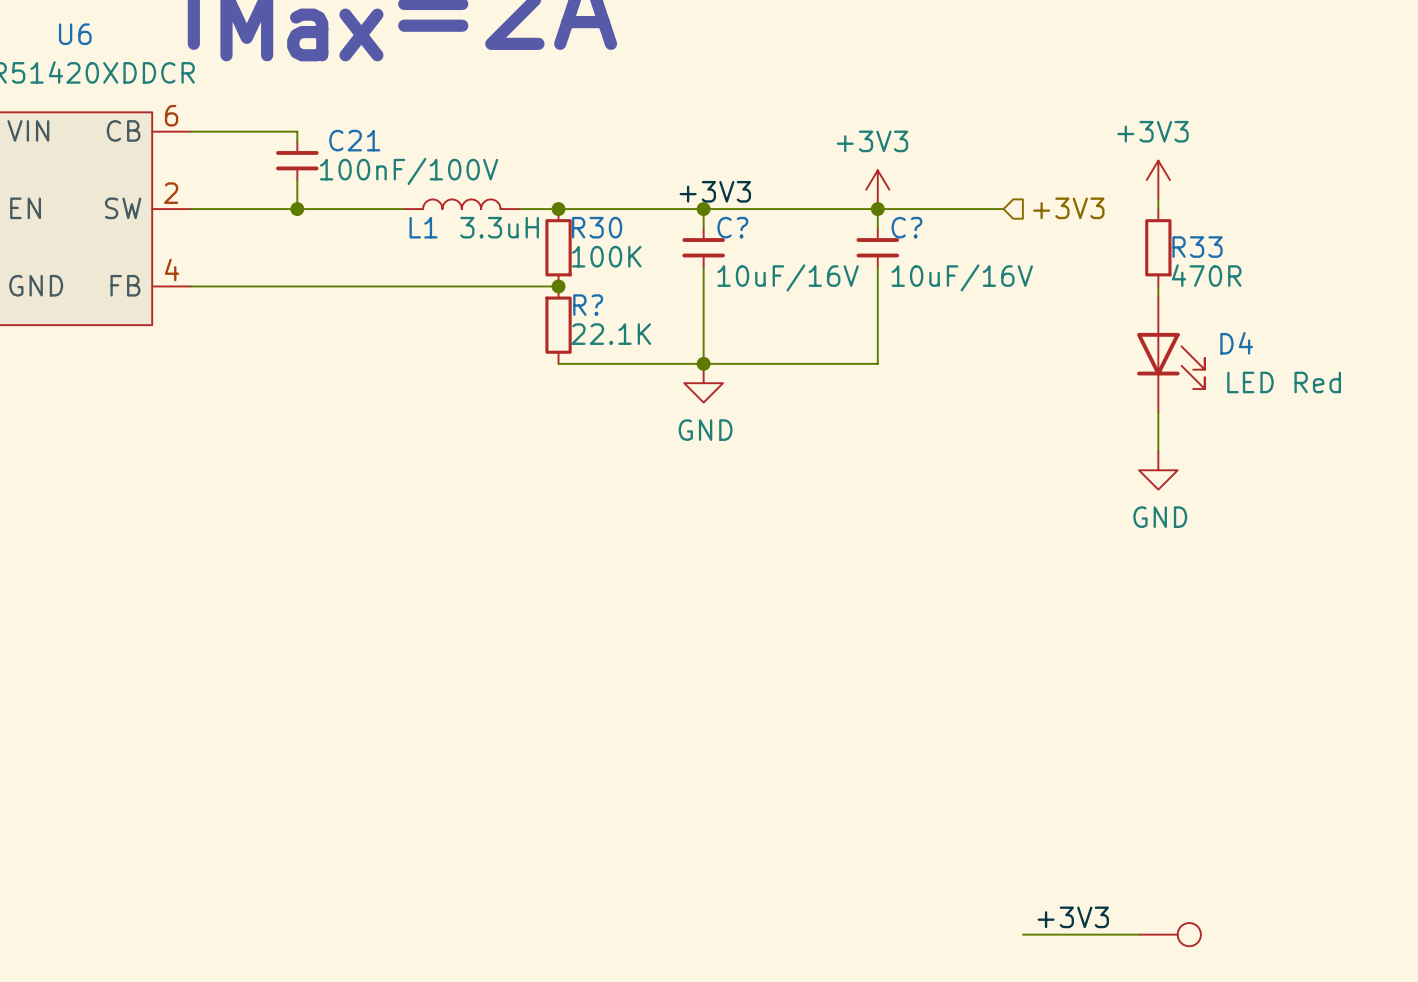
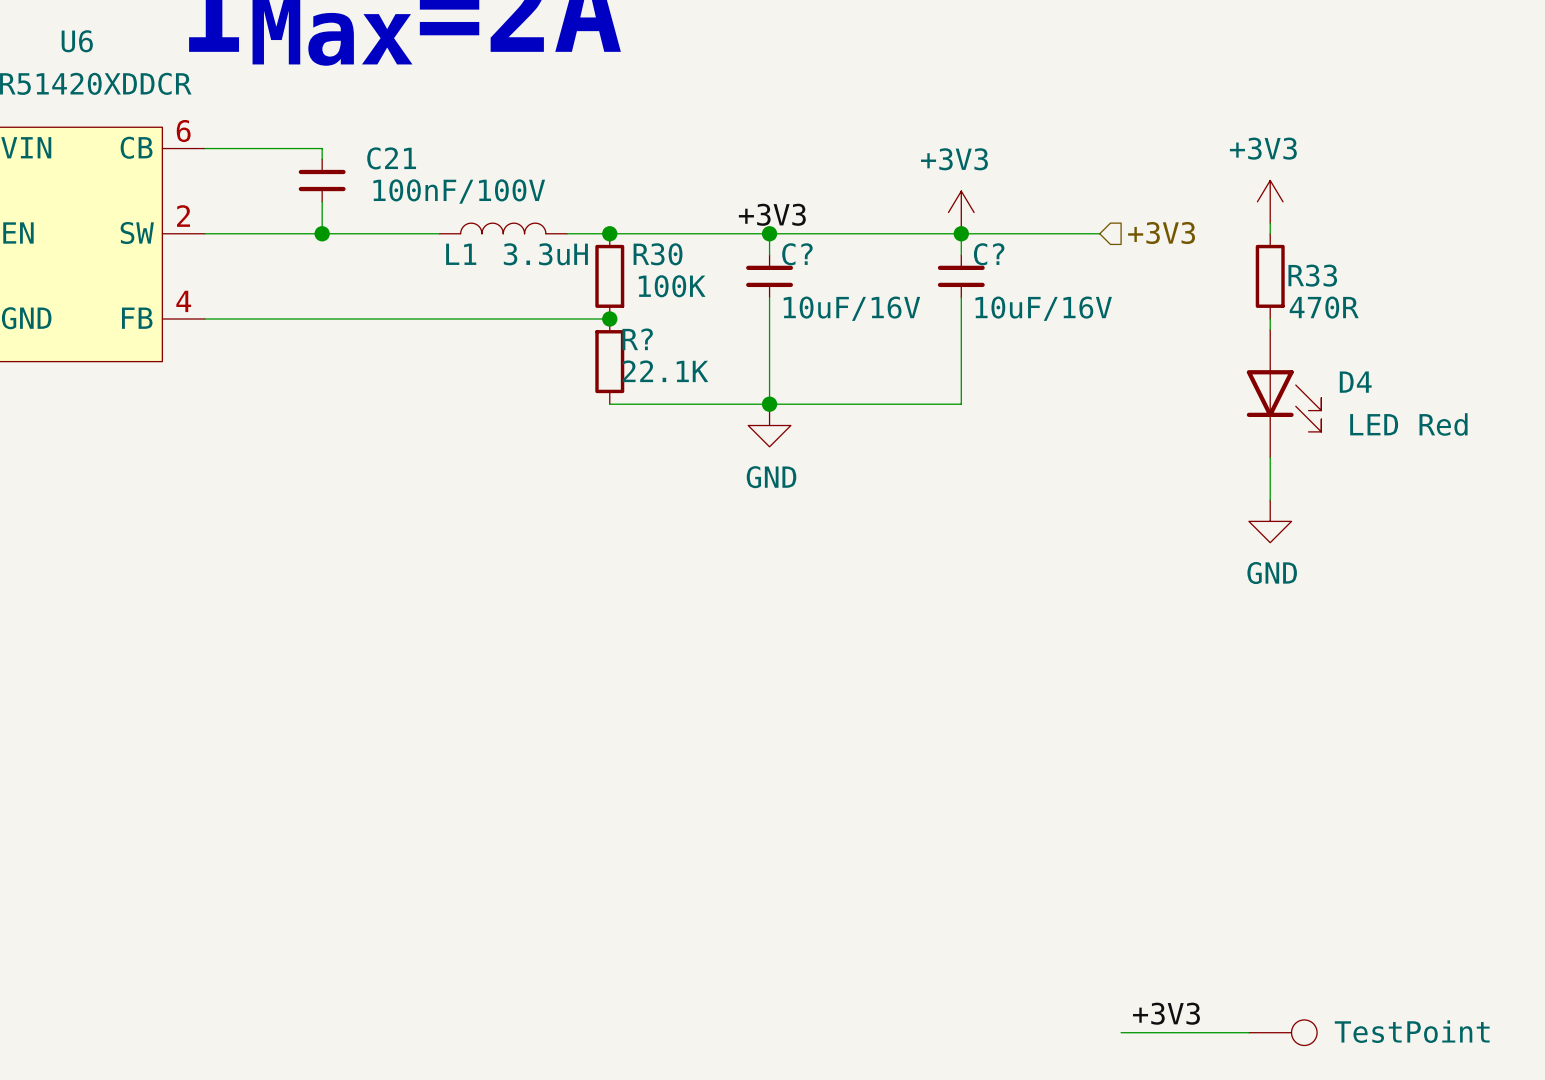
part value: none -> TestPoint (1412, 1031)

